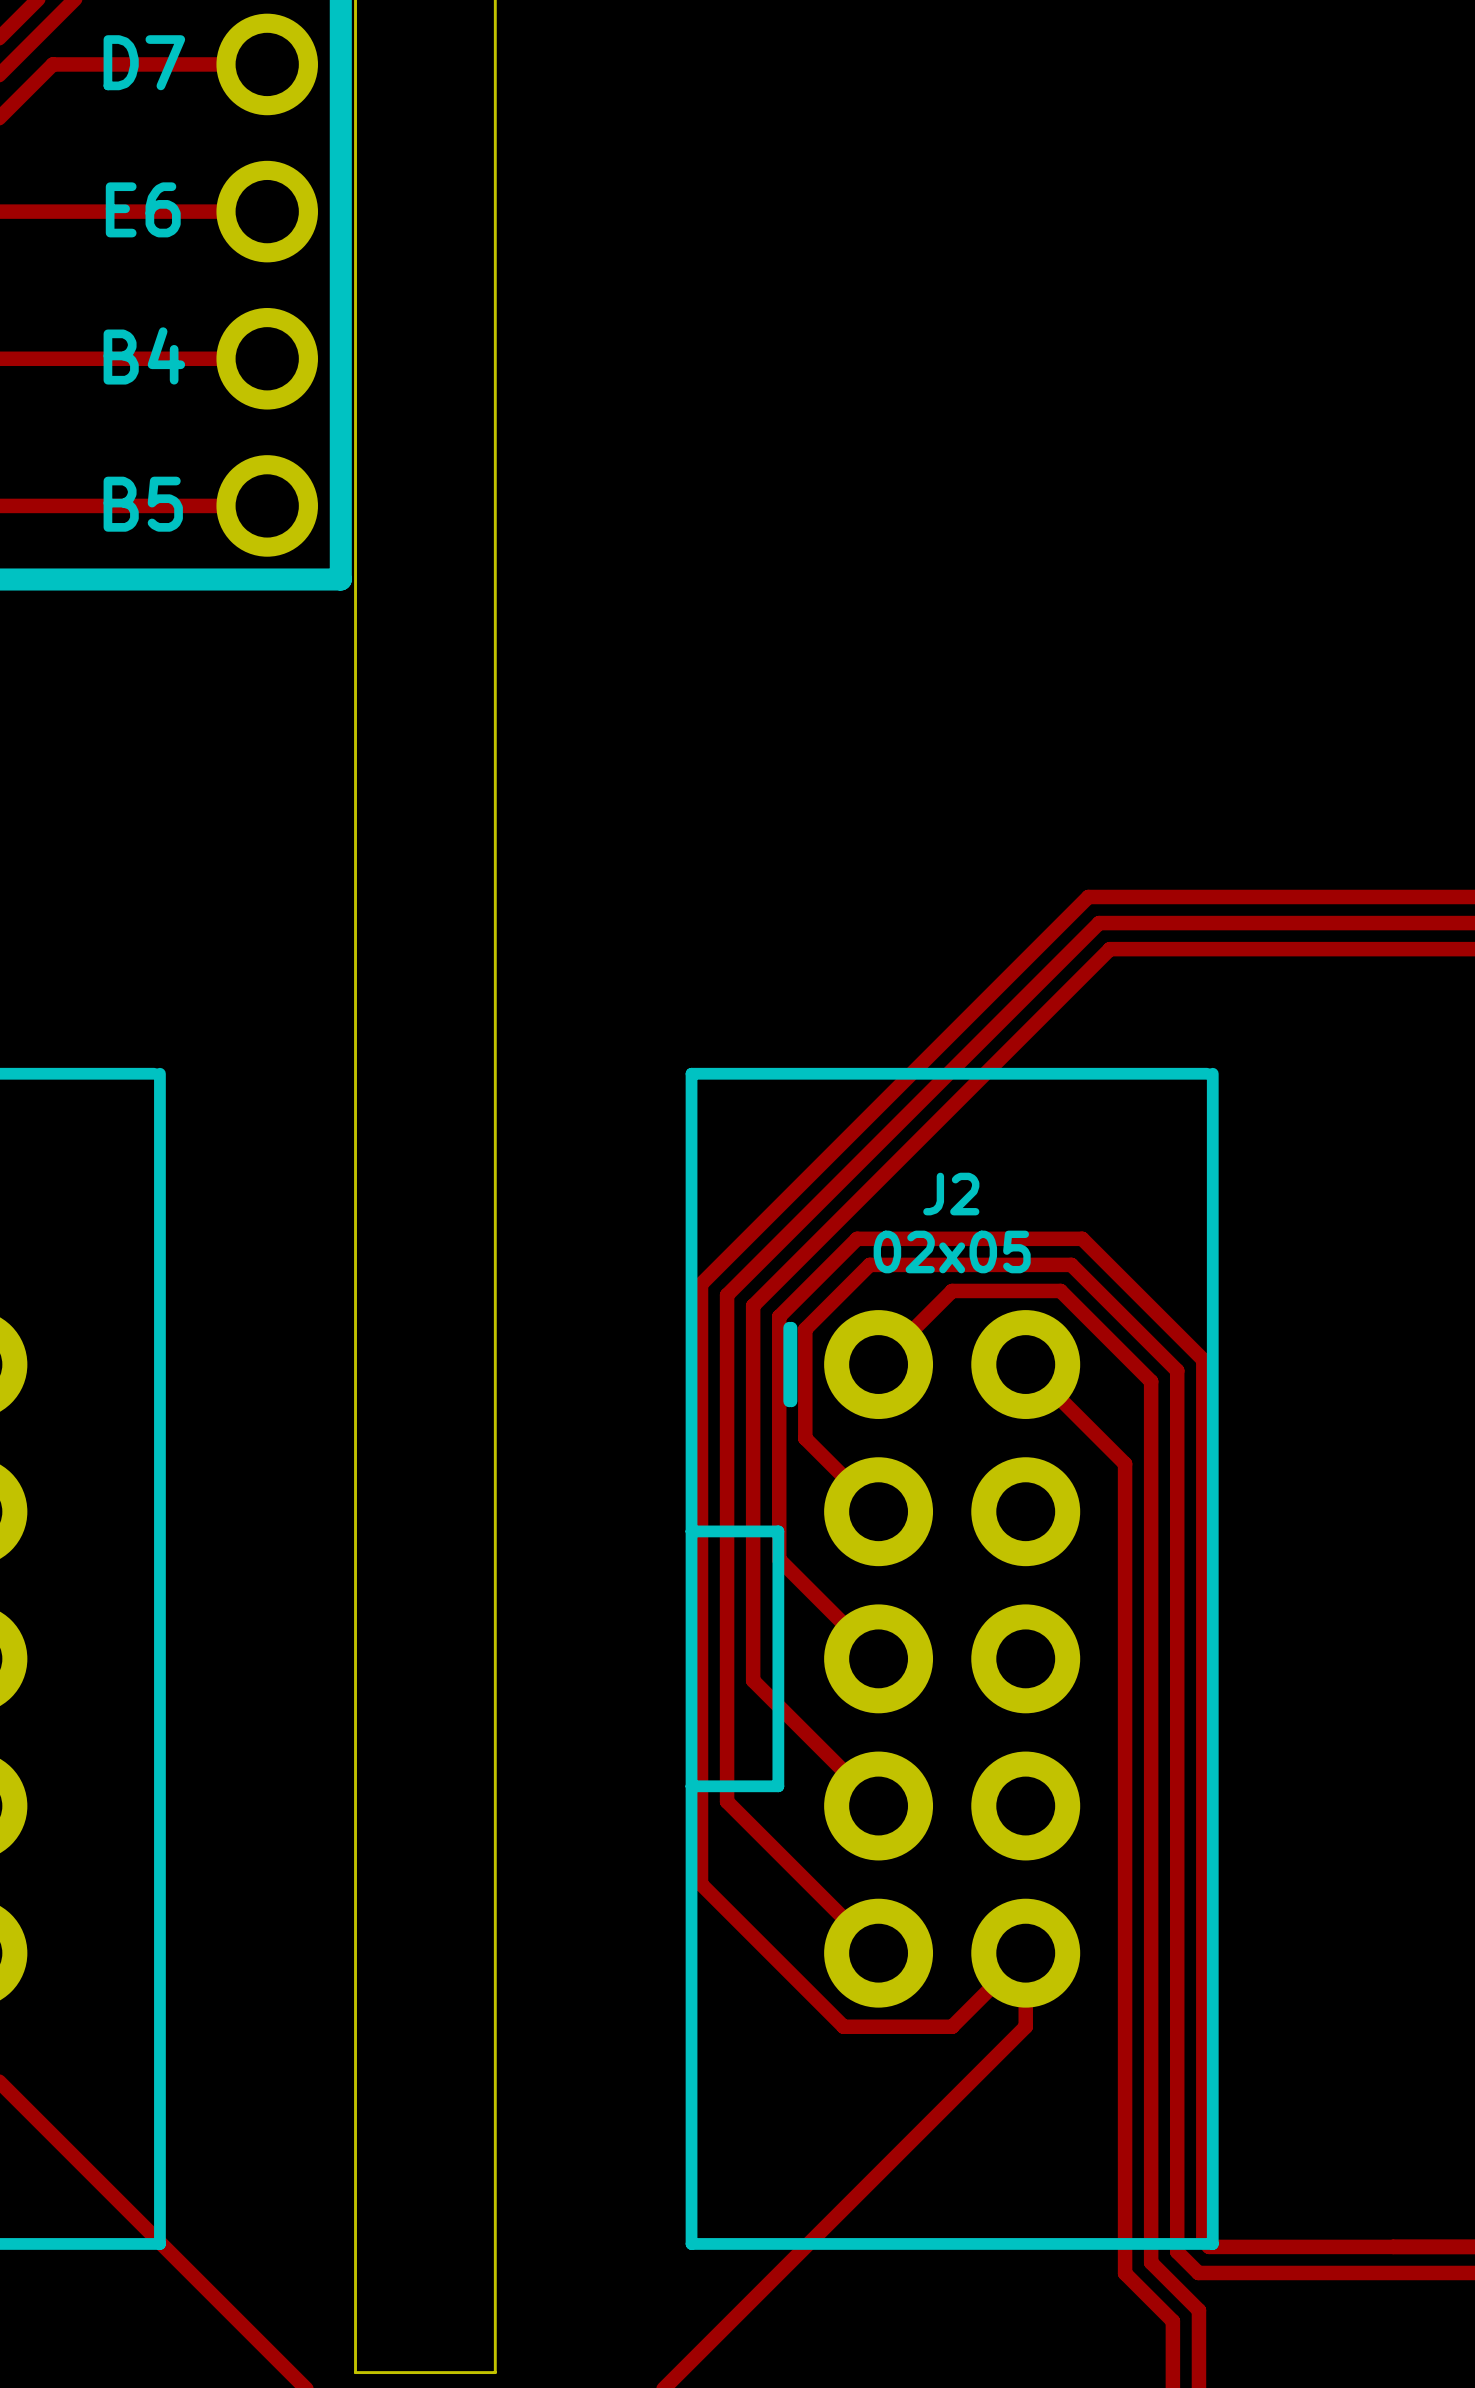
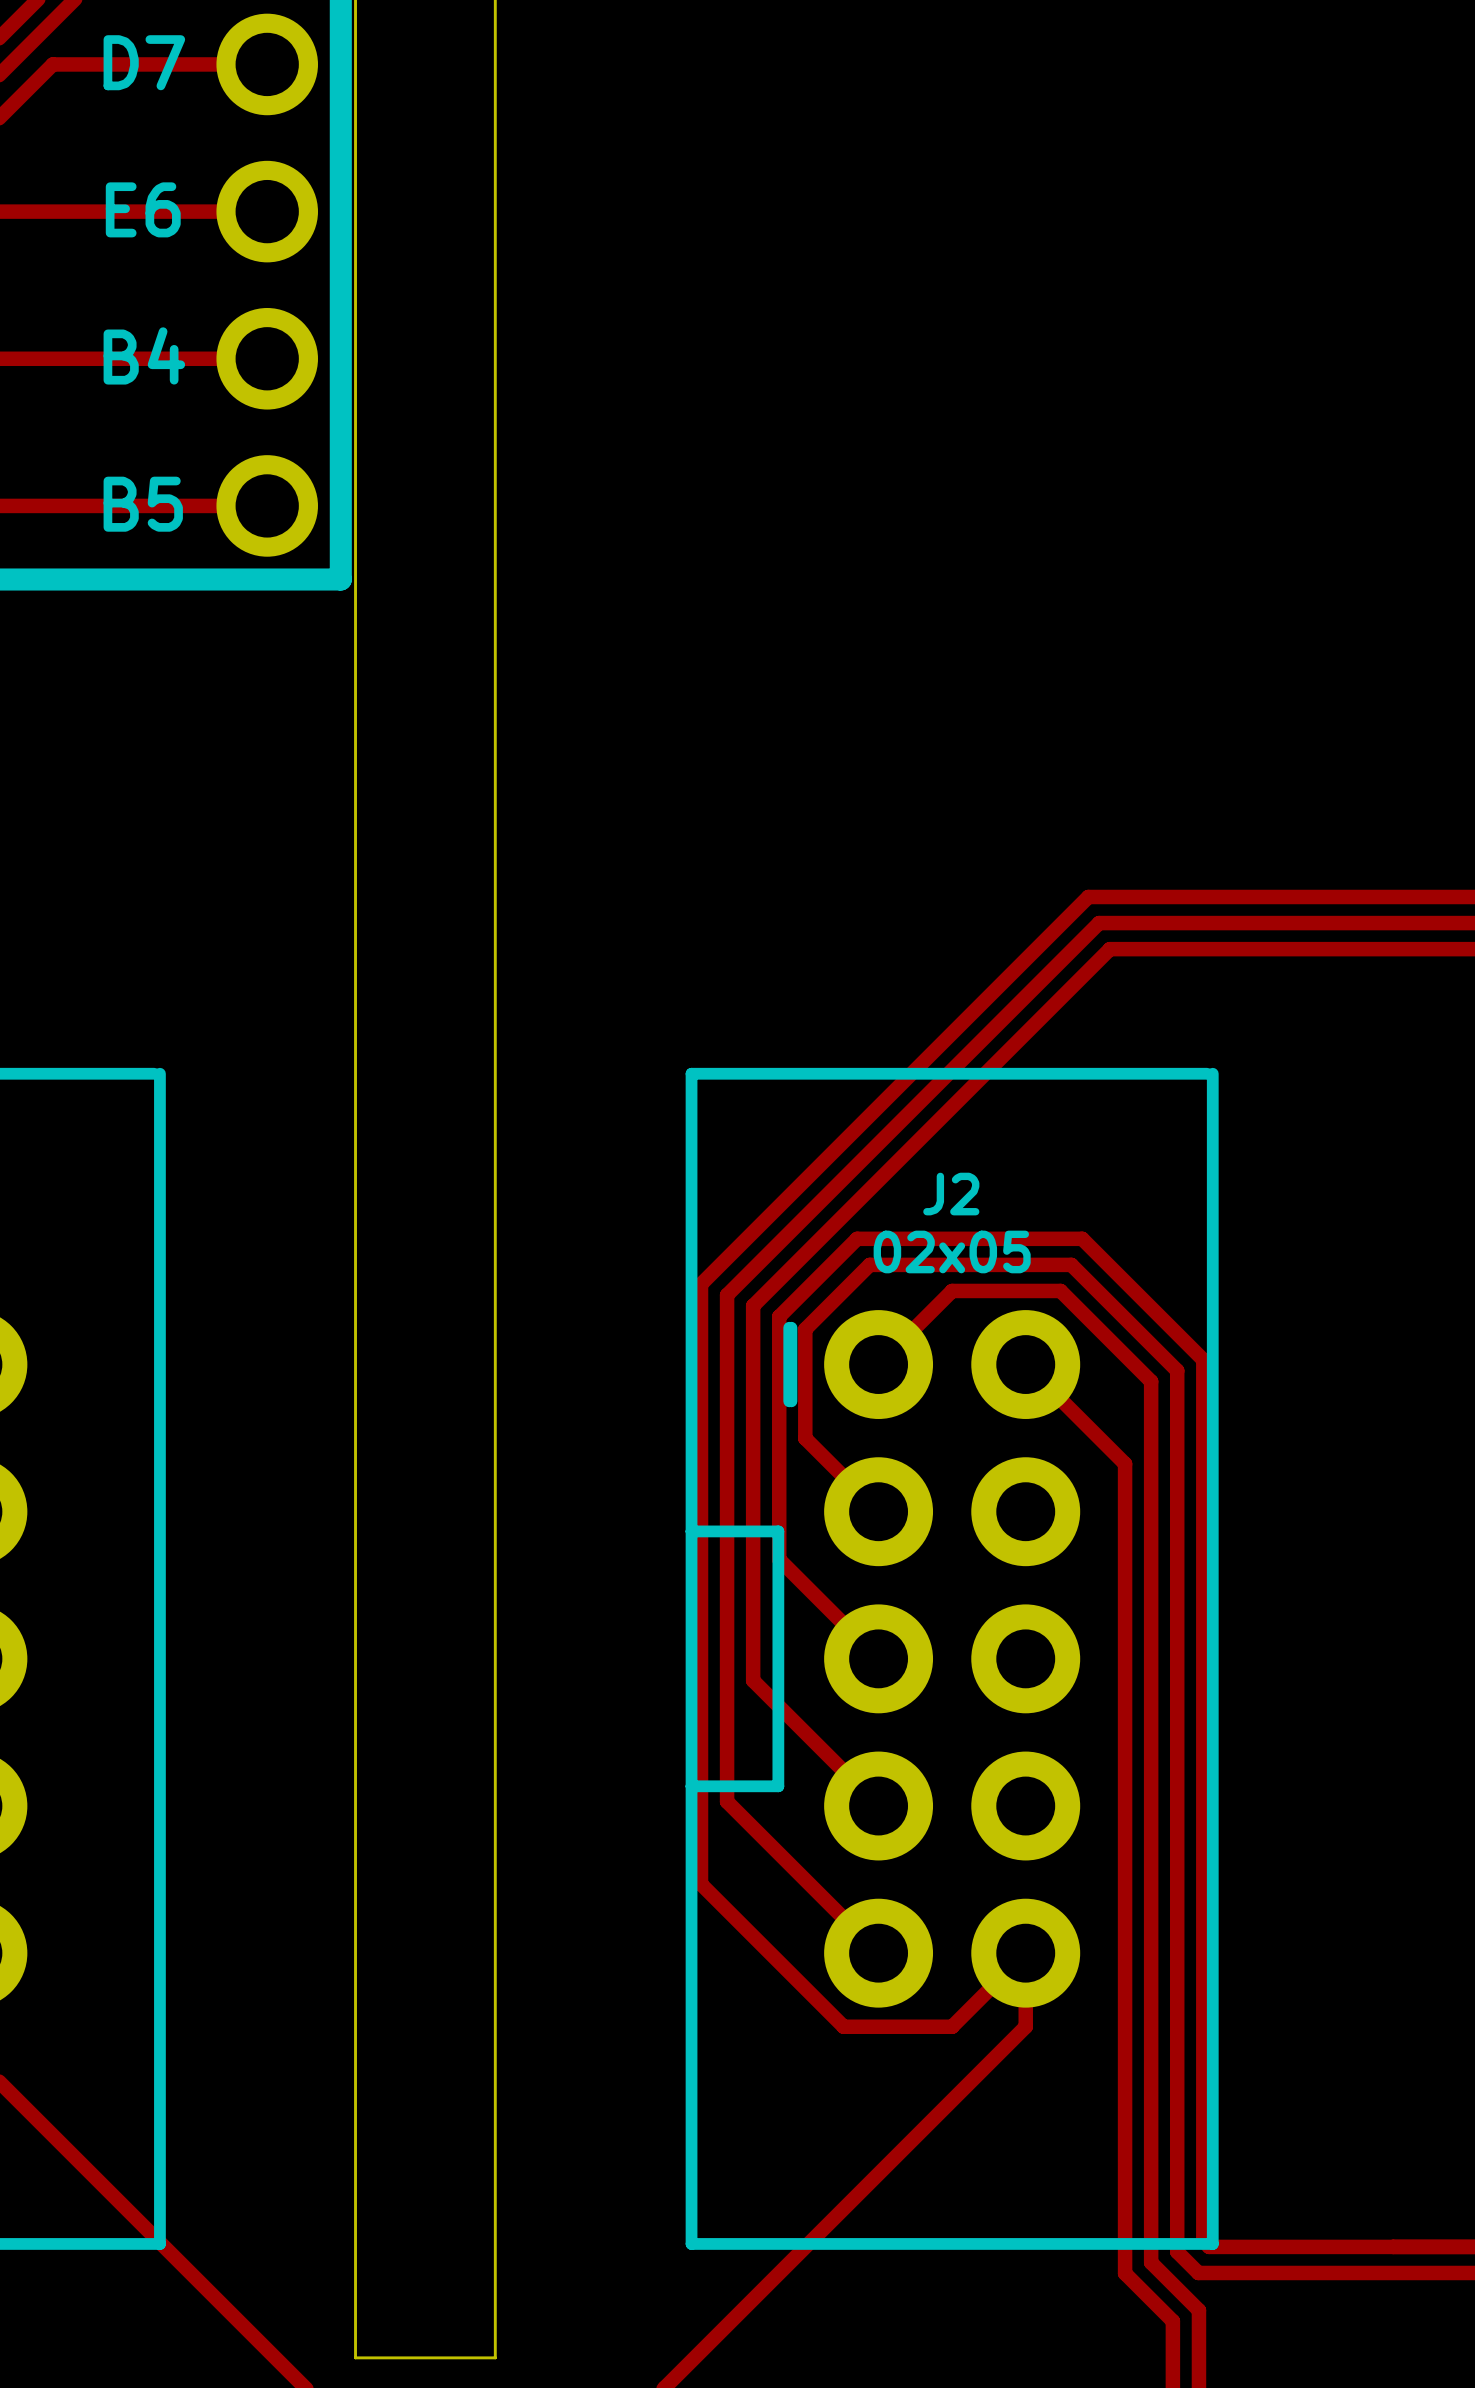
board edge: (355, 2357) (355, 2372) (495, 2372) (495, 2357) -> (355, 2357) (495, 2357)

